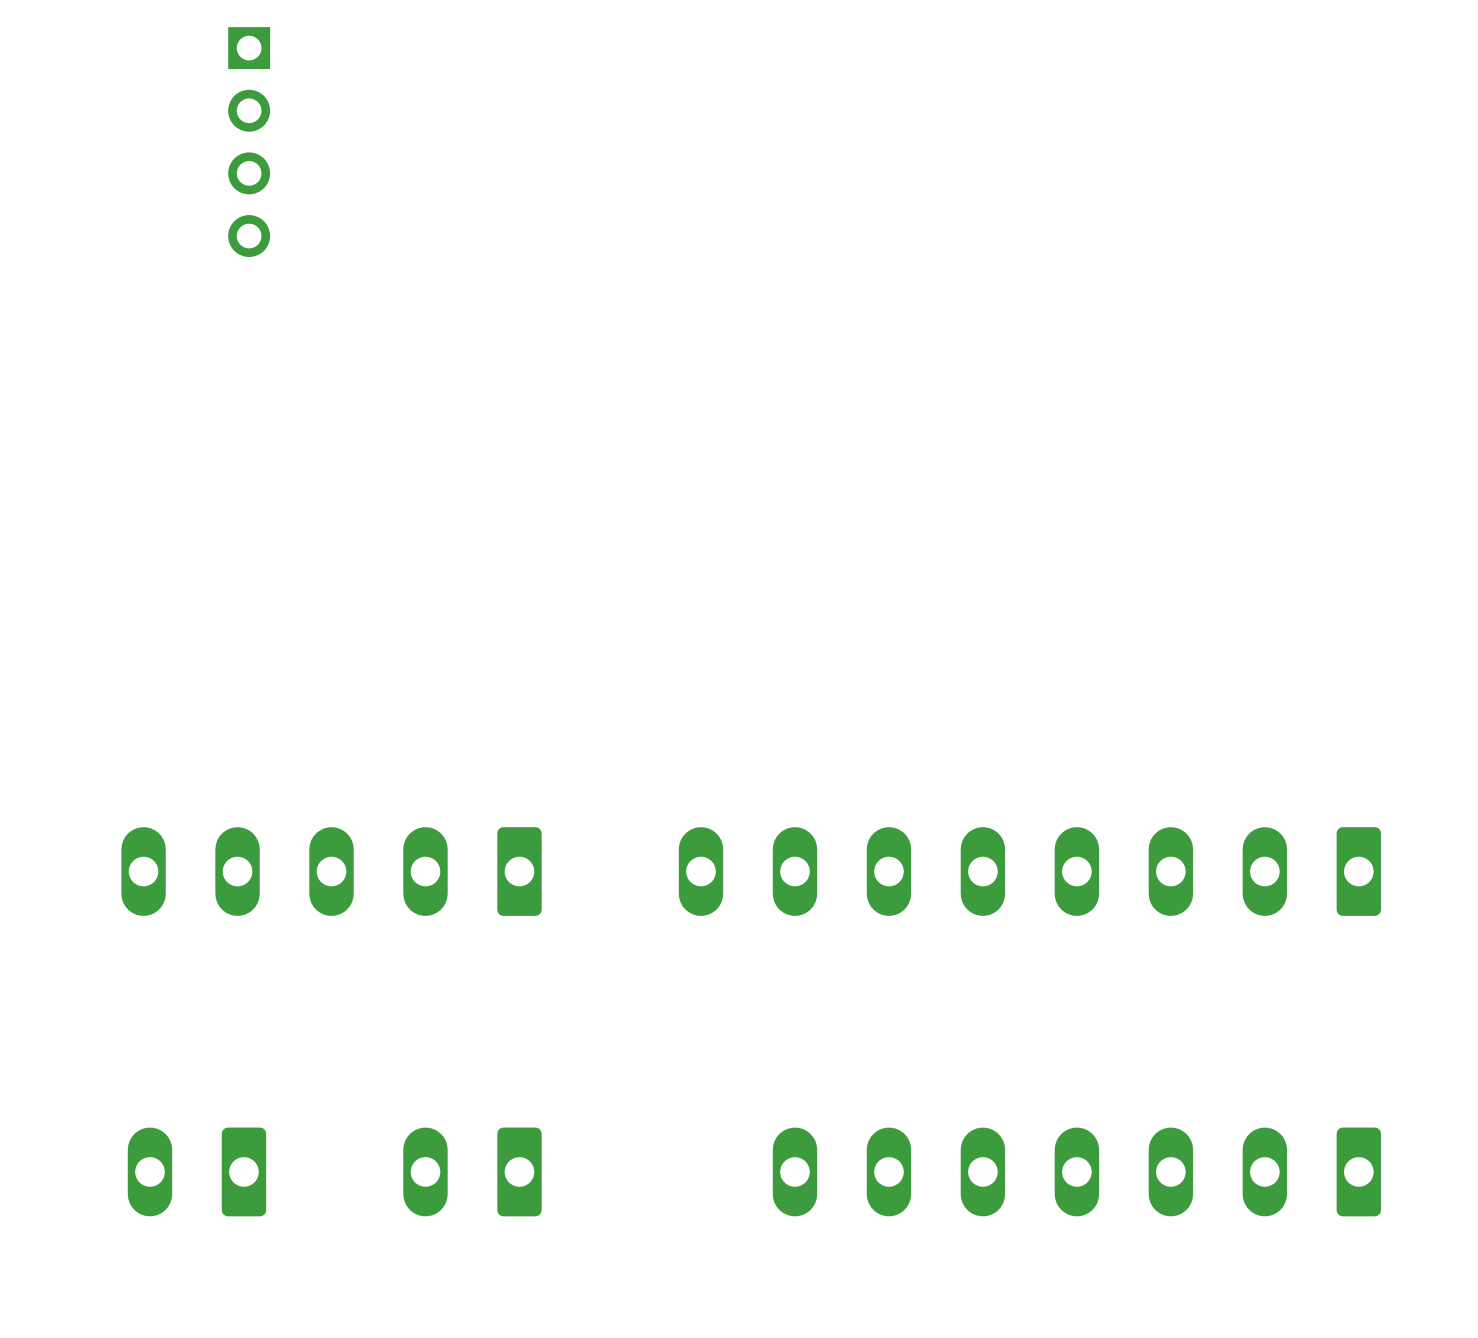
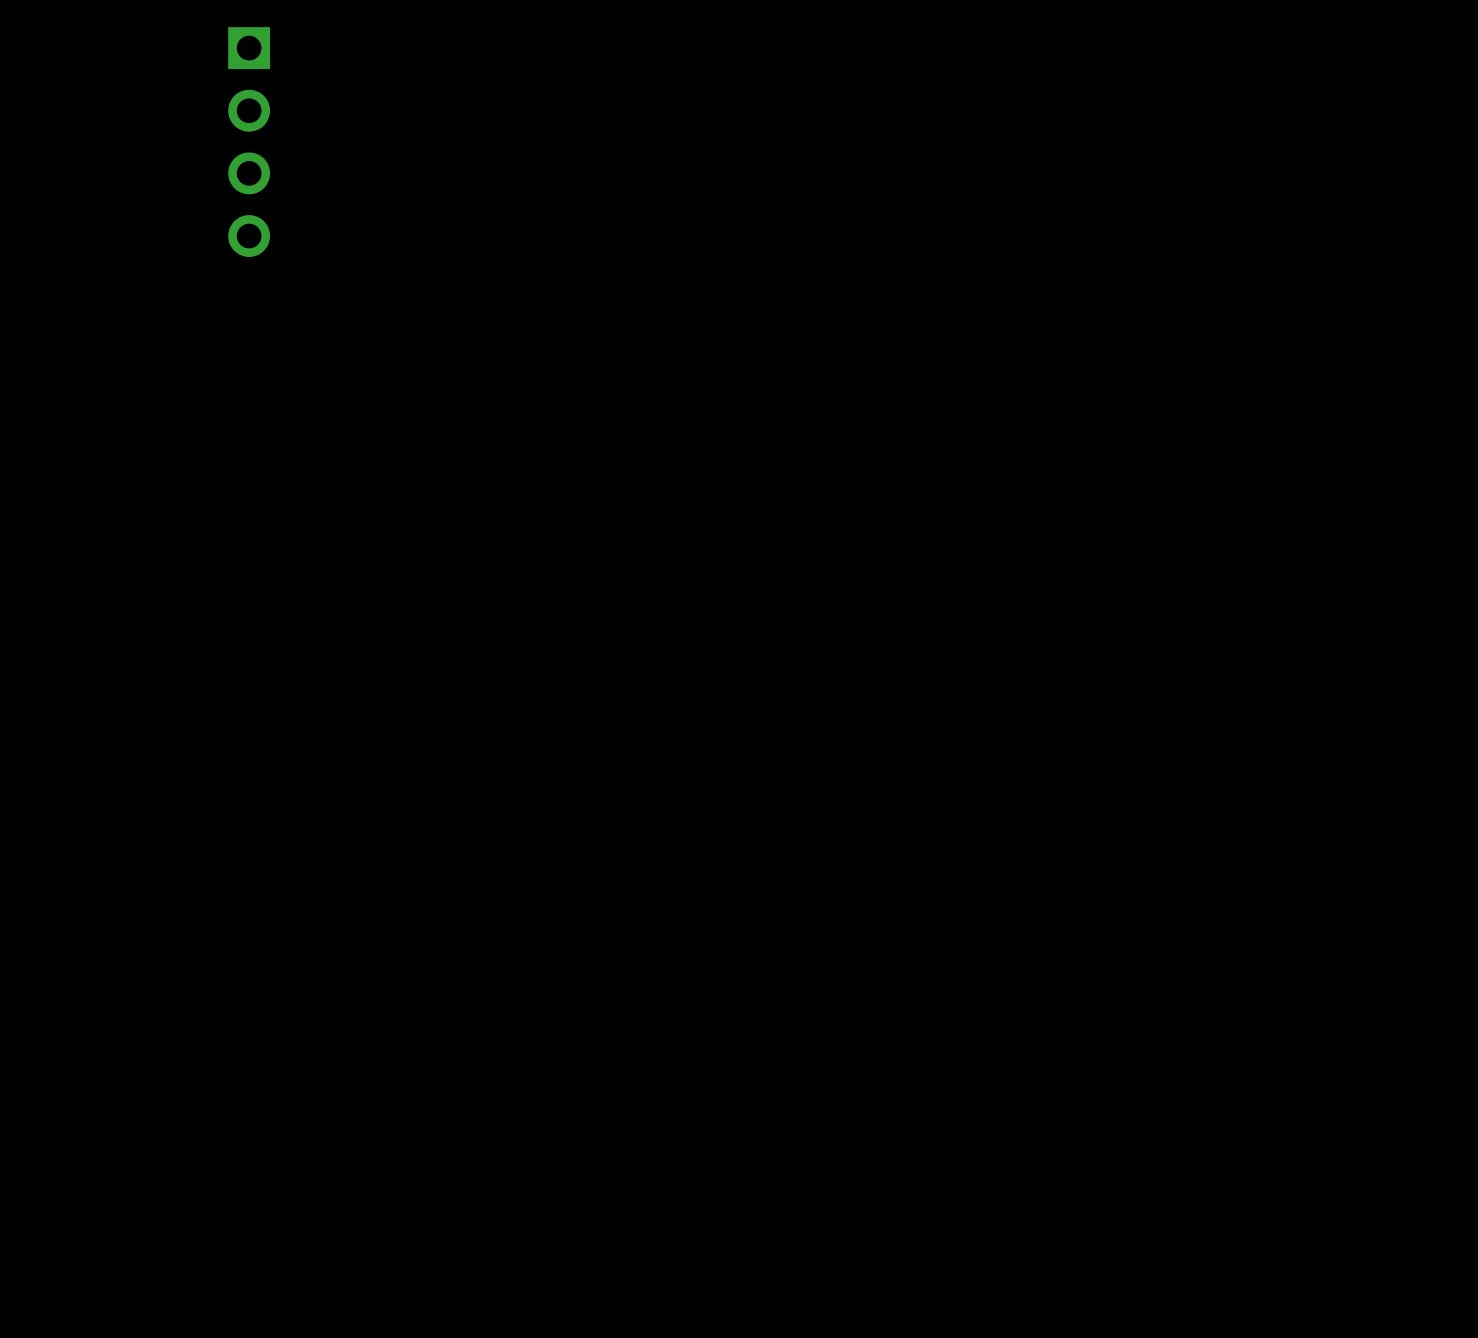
part: (331, 871) -> none
part: (1029, 871) -> none
part: (196, 1171) -> none
part: (472, 1171) -> none
part: (1076, 1171) -> none

